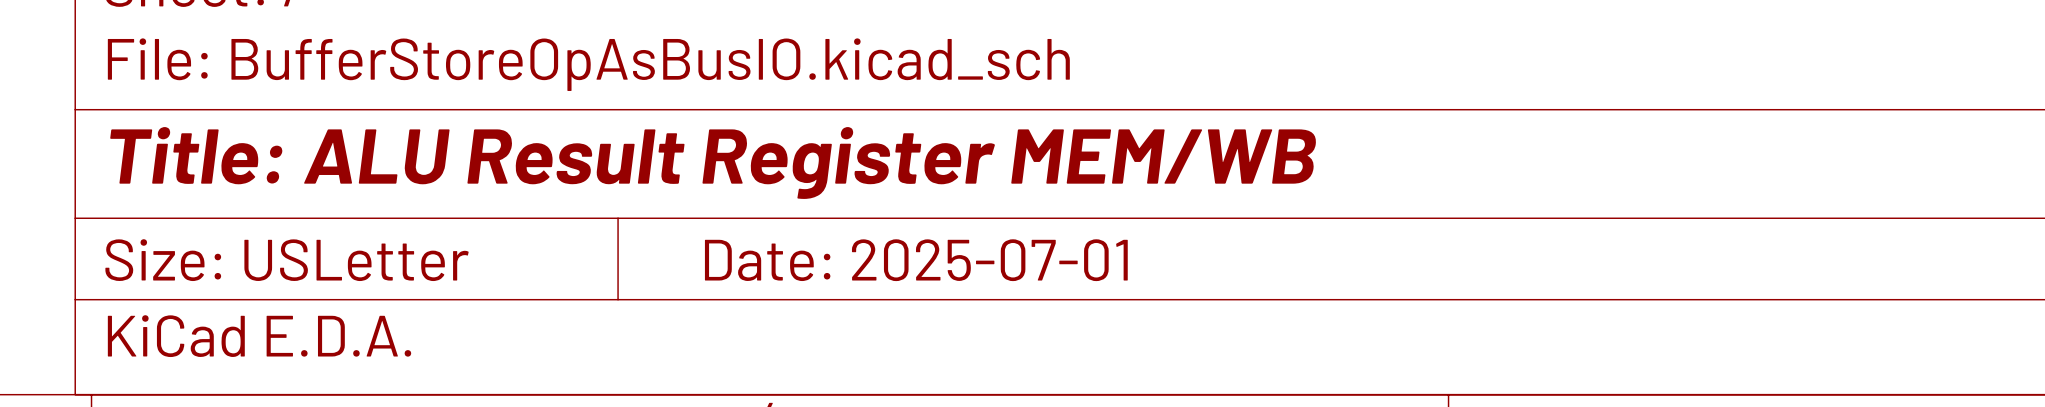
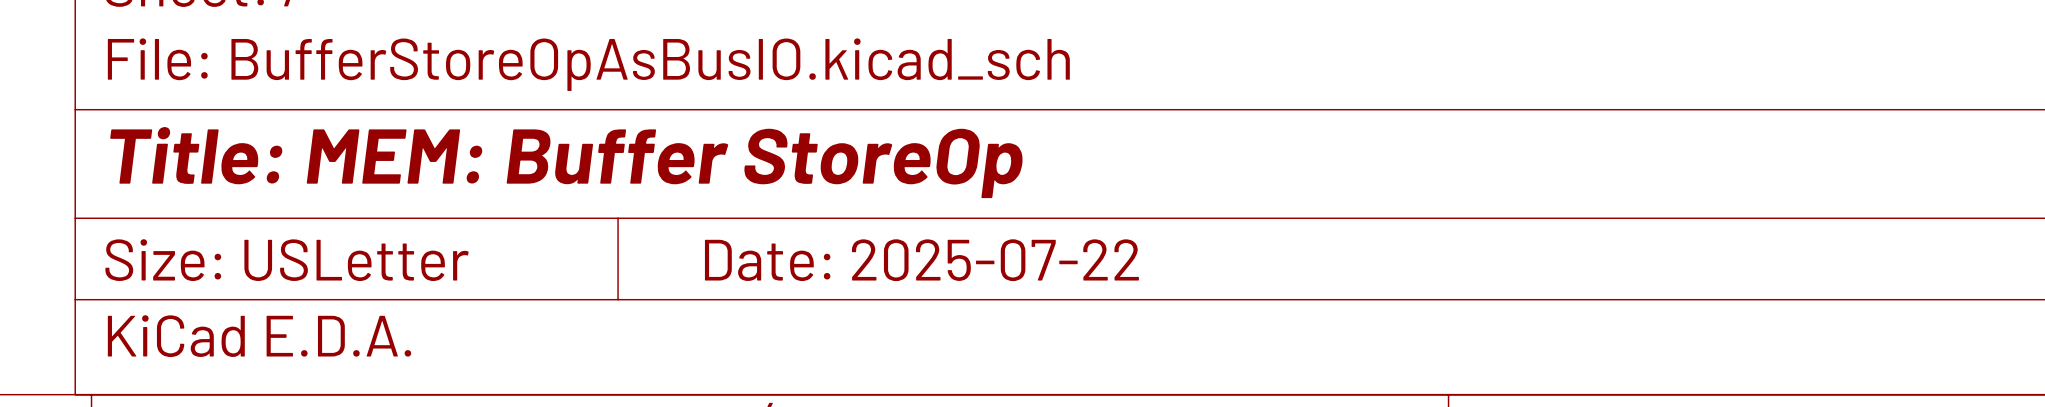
title block: Title: ALU Result Register MEM/WB (713, 163) -> Title: MEM: Buffer StoreOp (566, 162)
title block: Date: 2025-07-01 (916, 260) -> Date: 2025-07-22 (921, 260)

